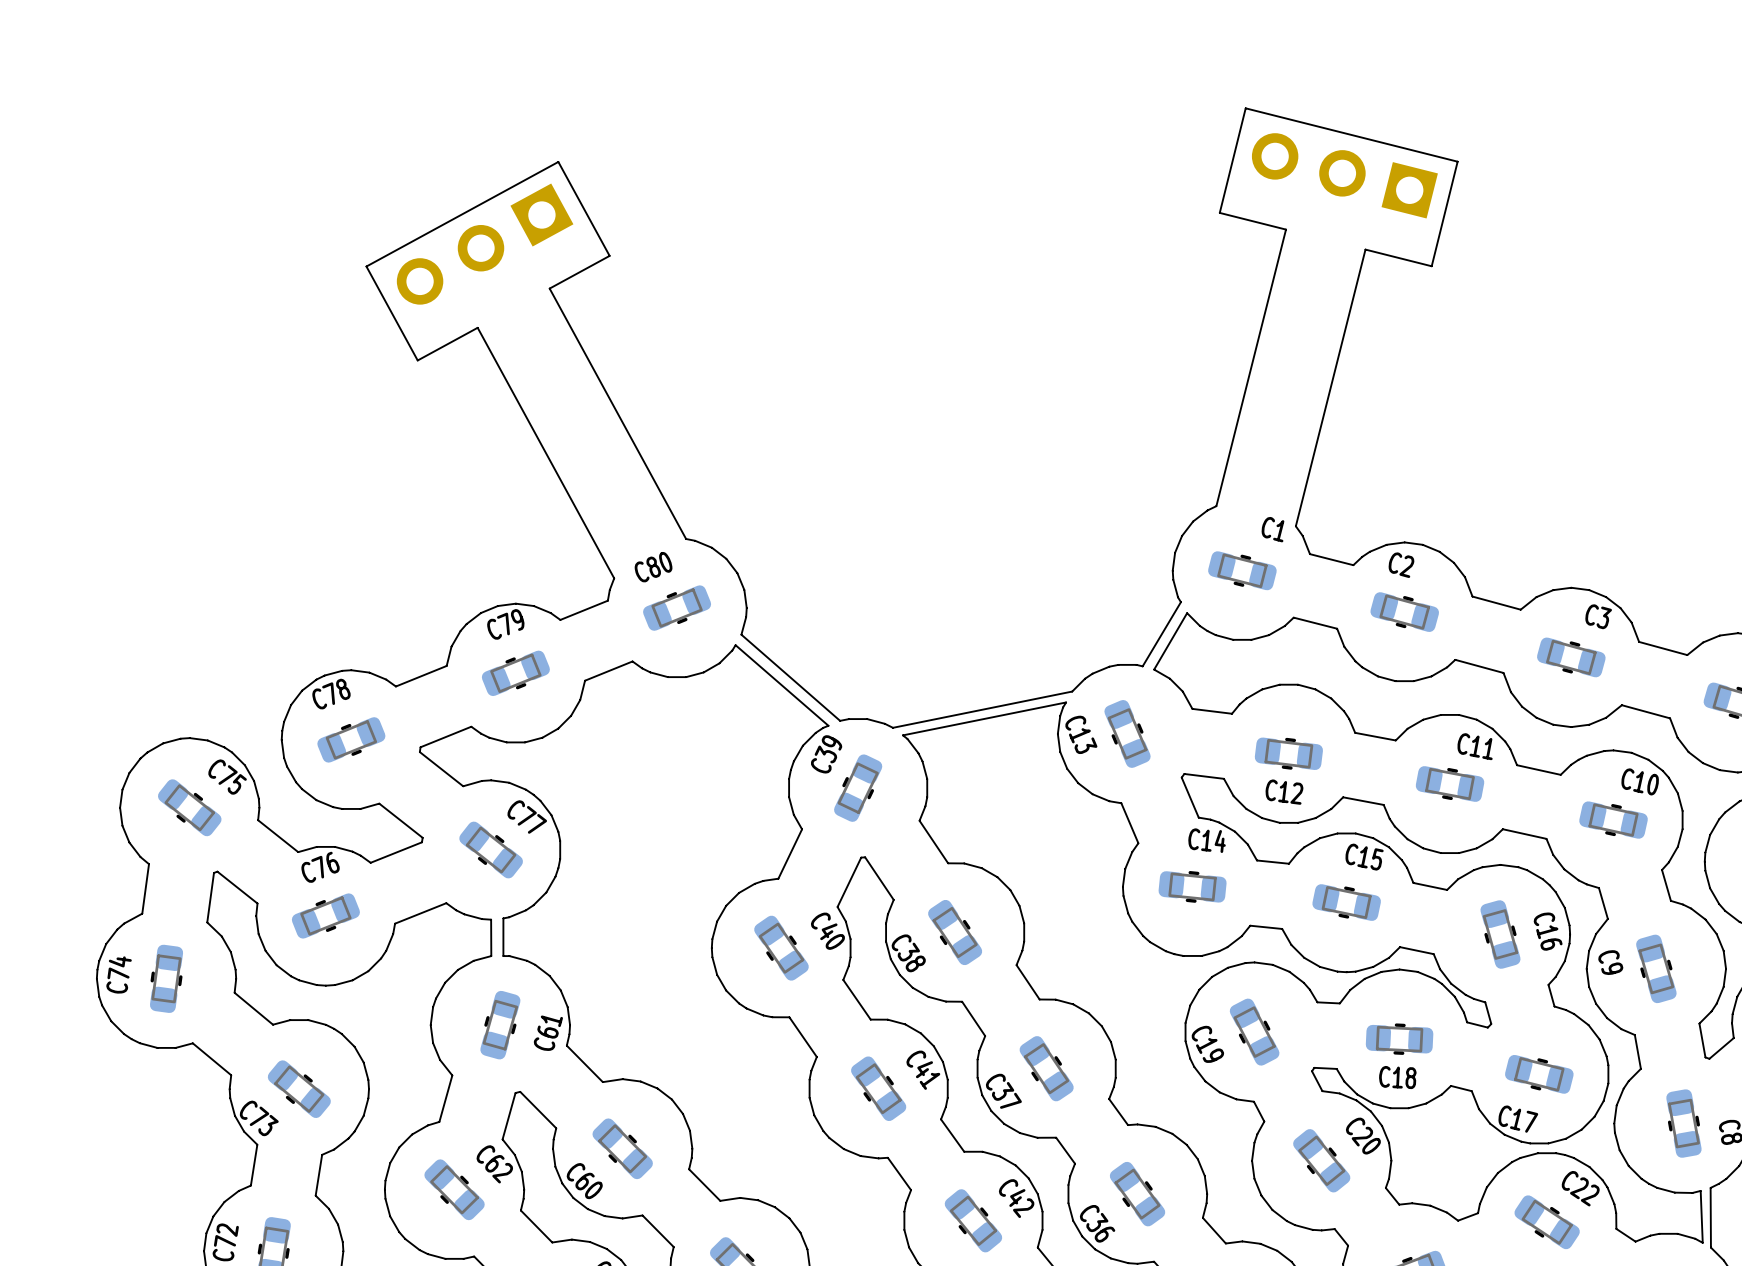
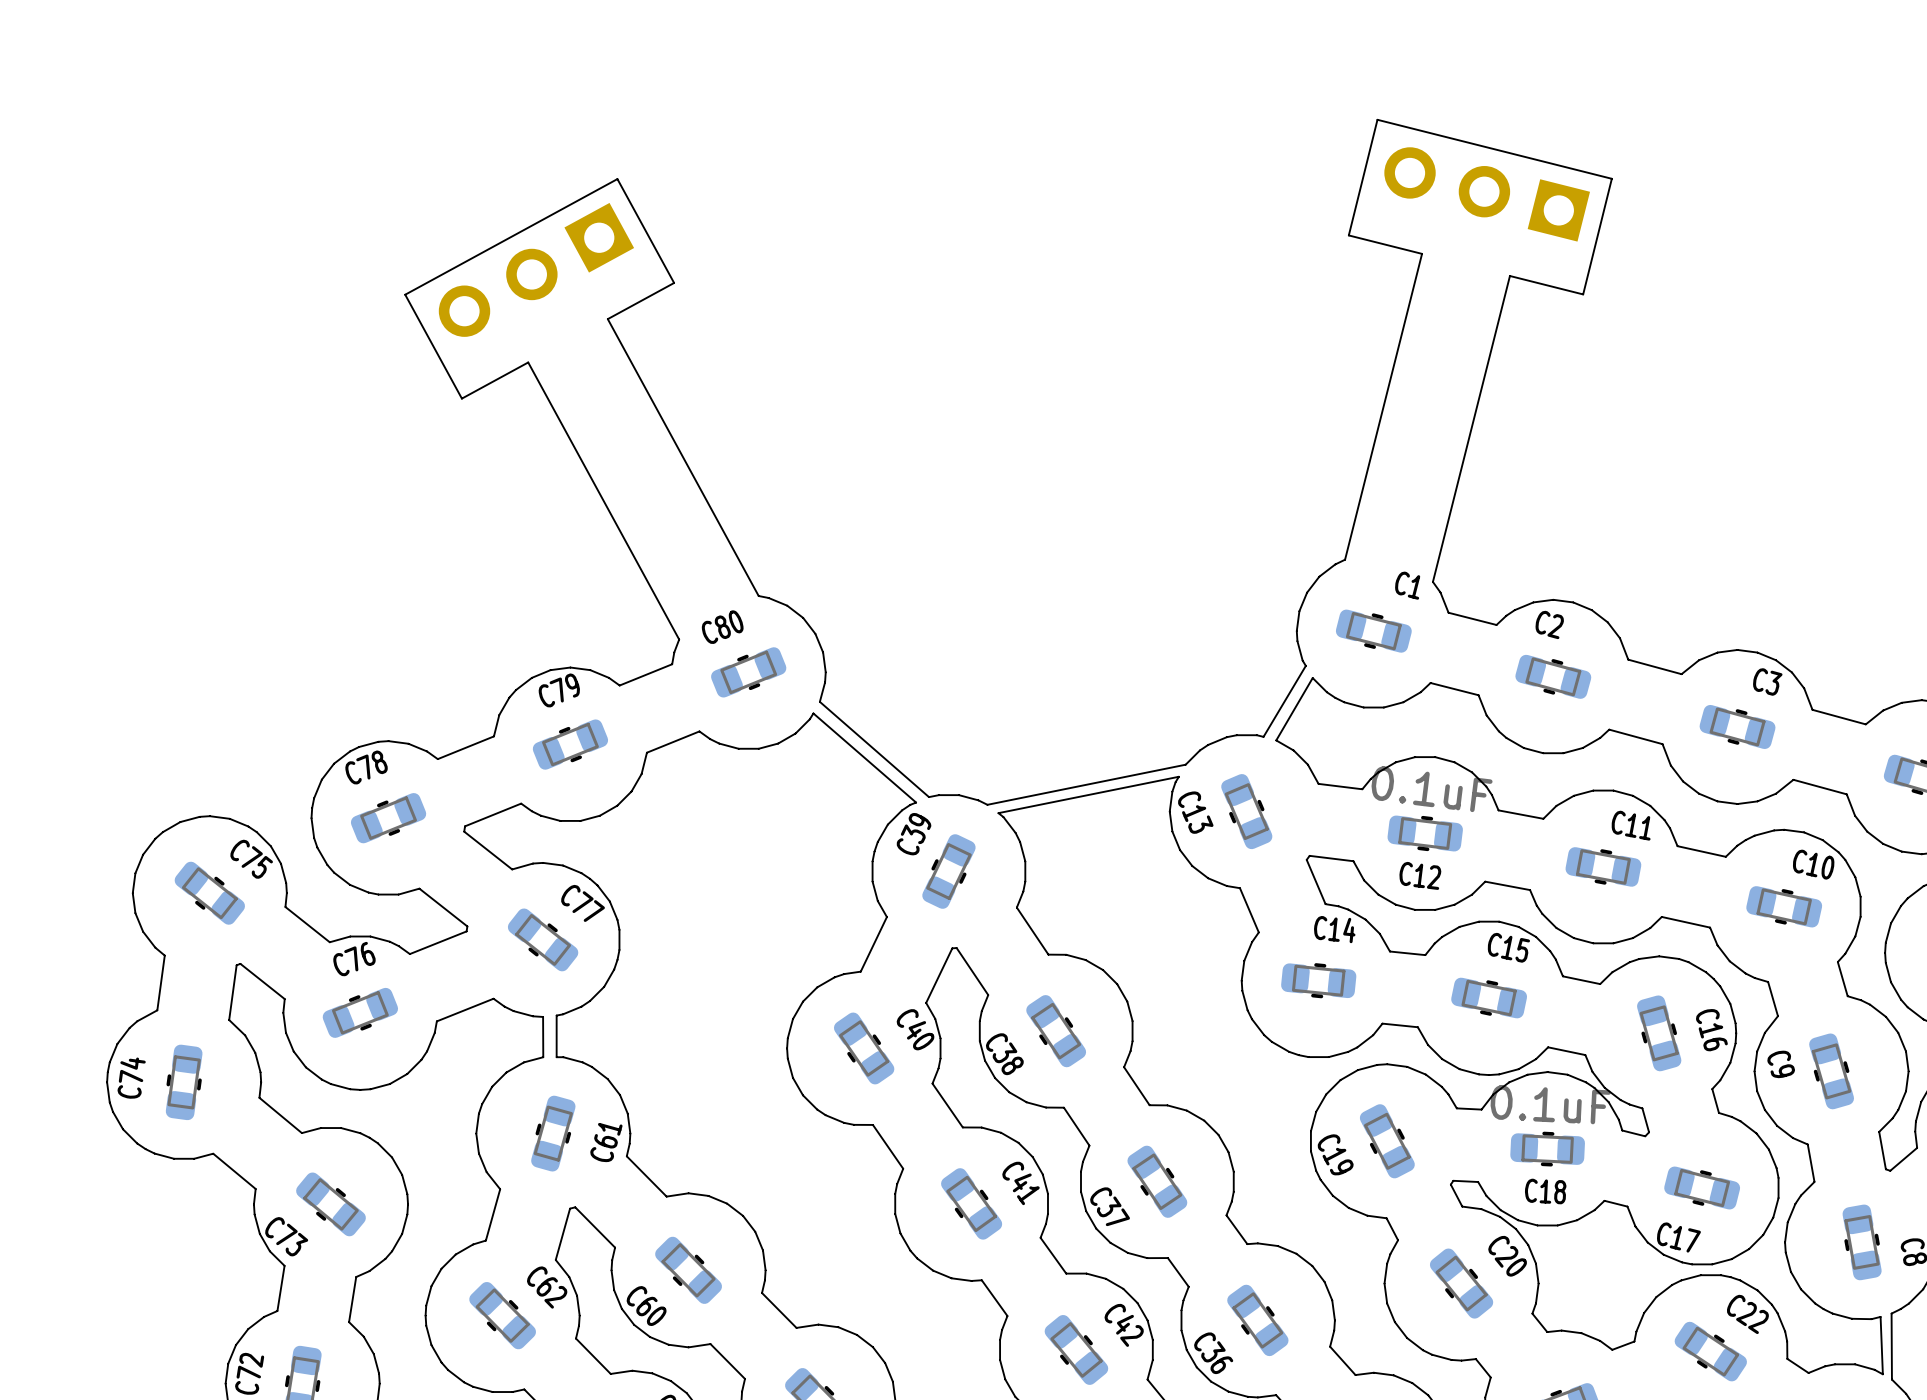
C12 value: none -> 0.1uF (1432, 789)
C18 value: none -> 0.1uF (1550, 1104)

